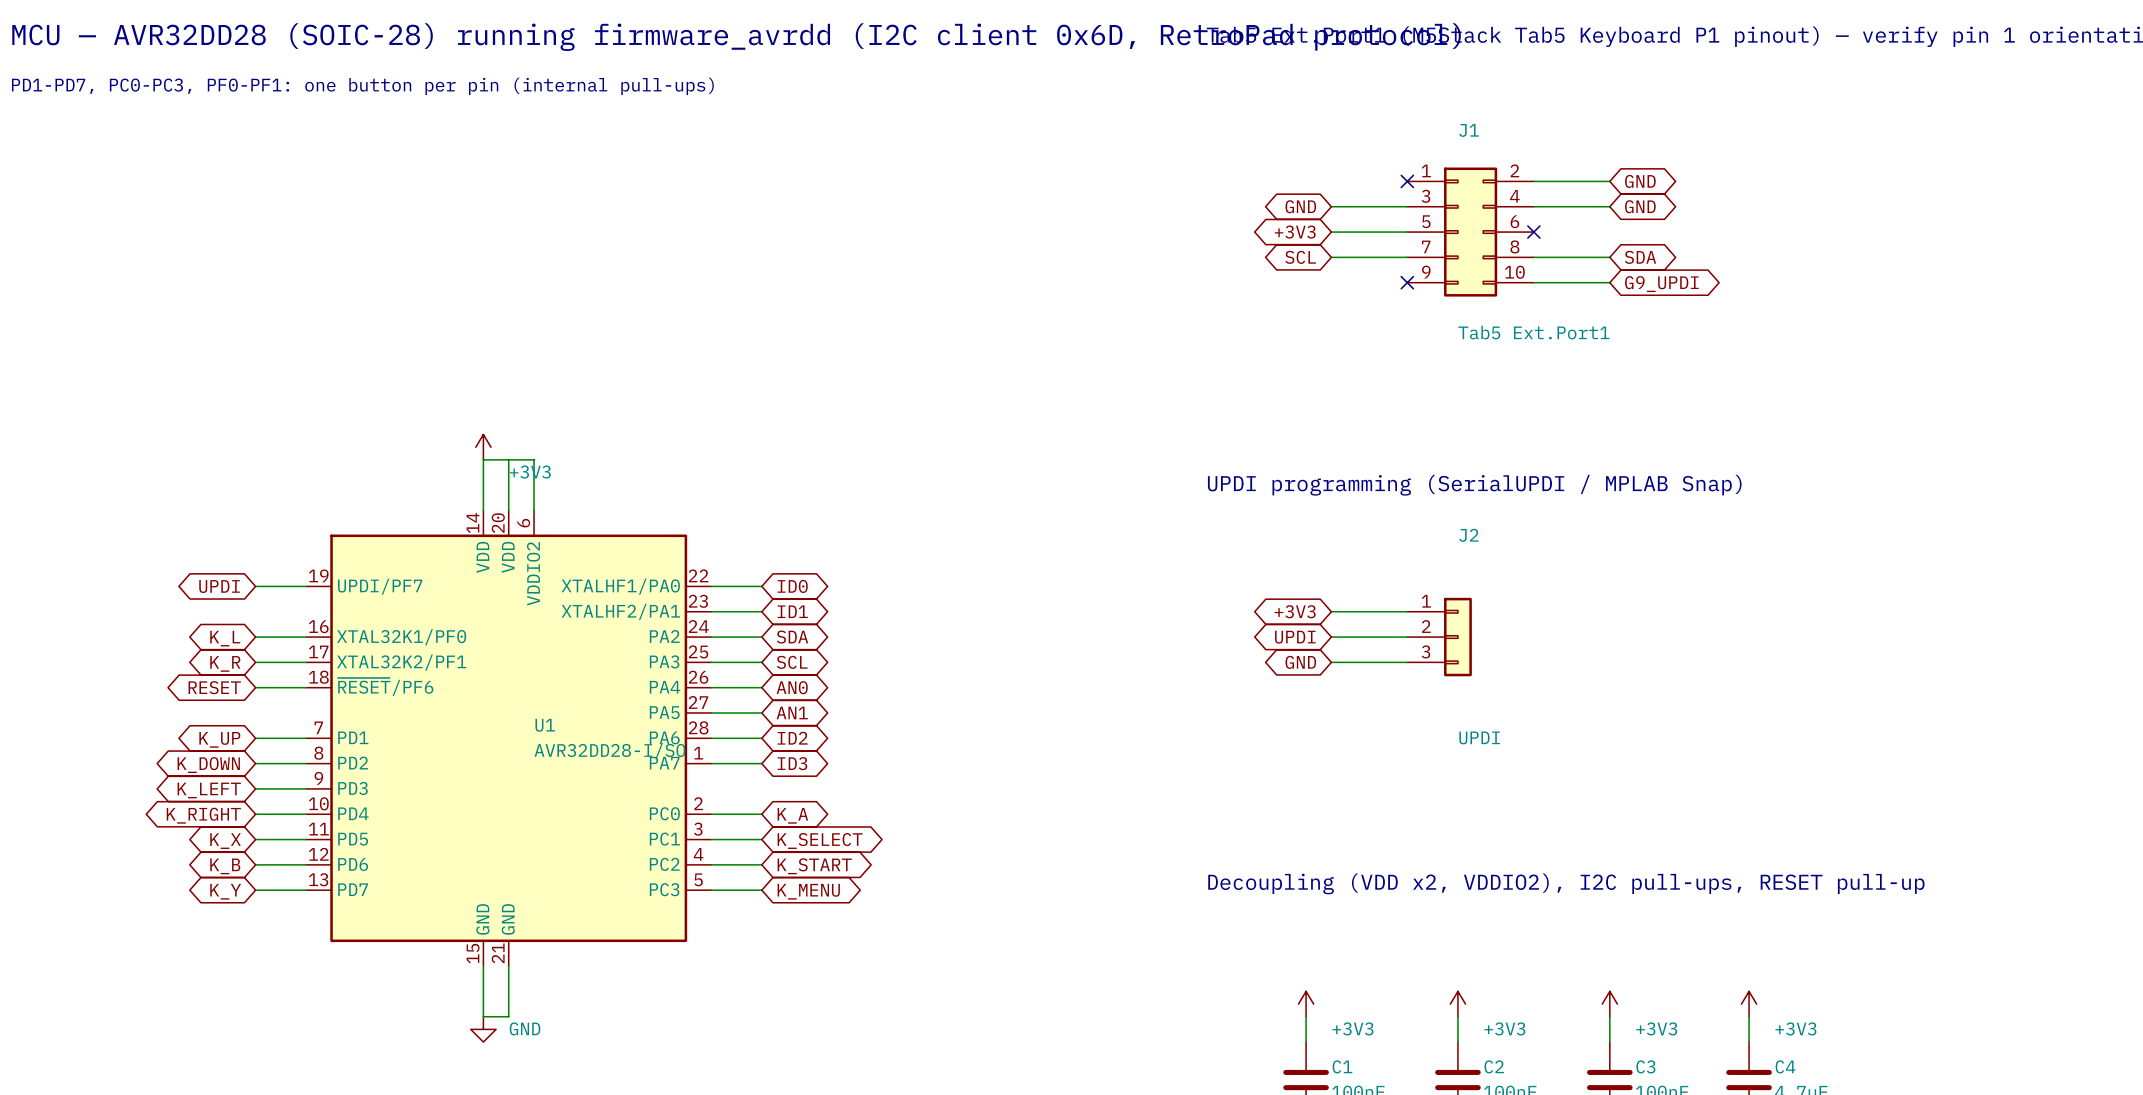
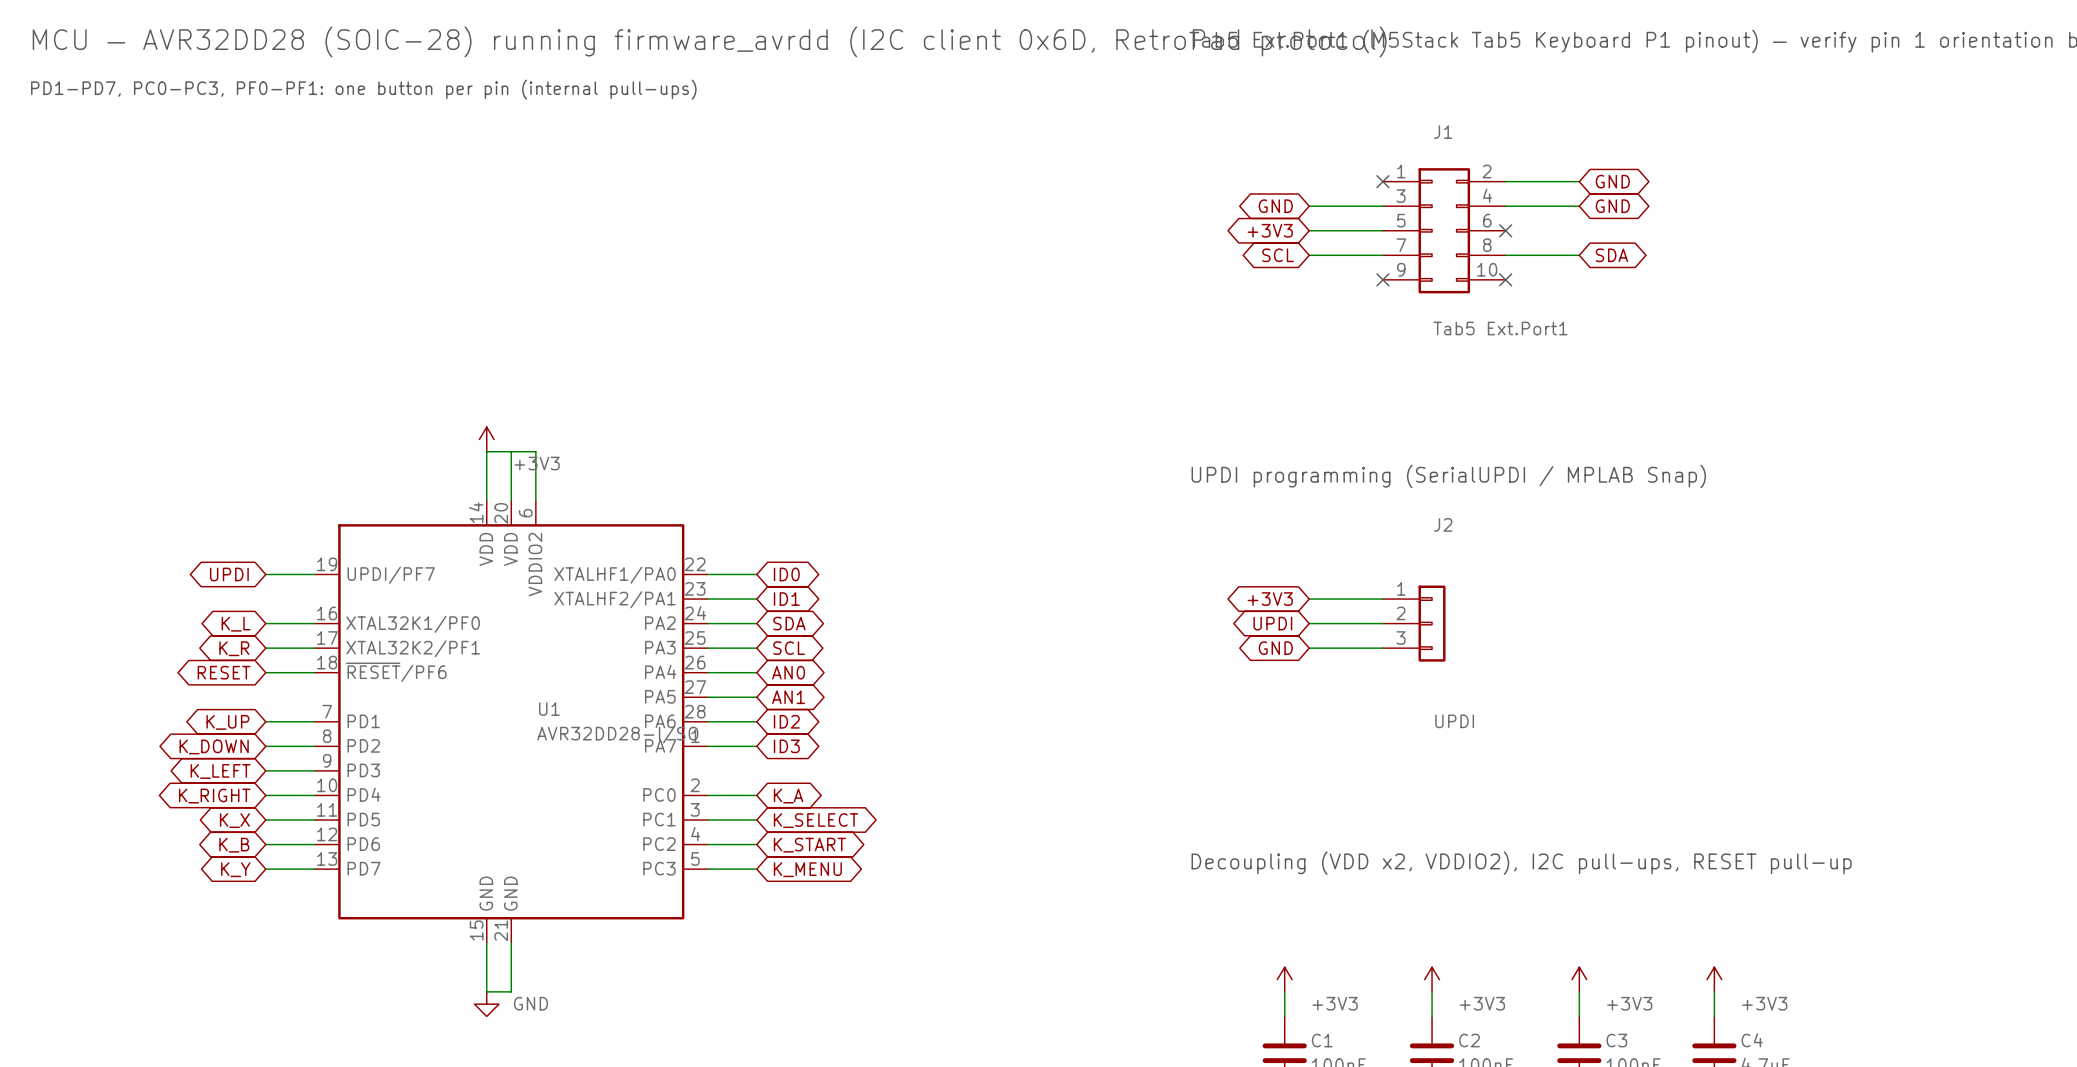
wire: (1533, 282) (1609, 282) -> none
no-connect mark: none -> (1505, 279)
global label: G9_UPDI (1661, 284) -> none

